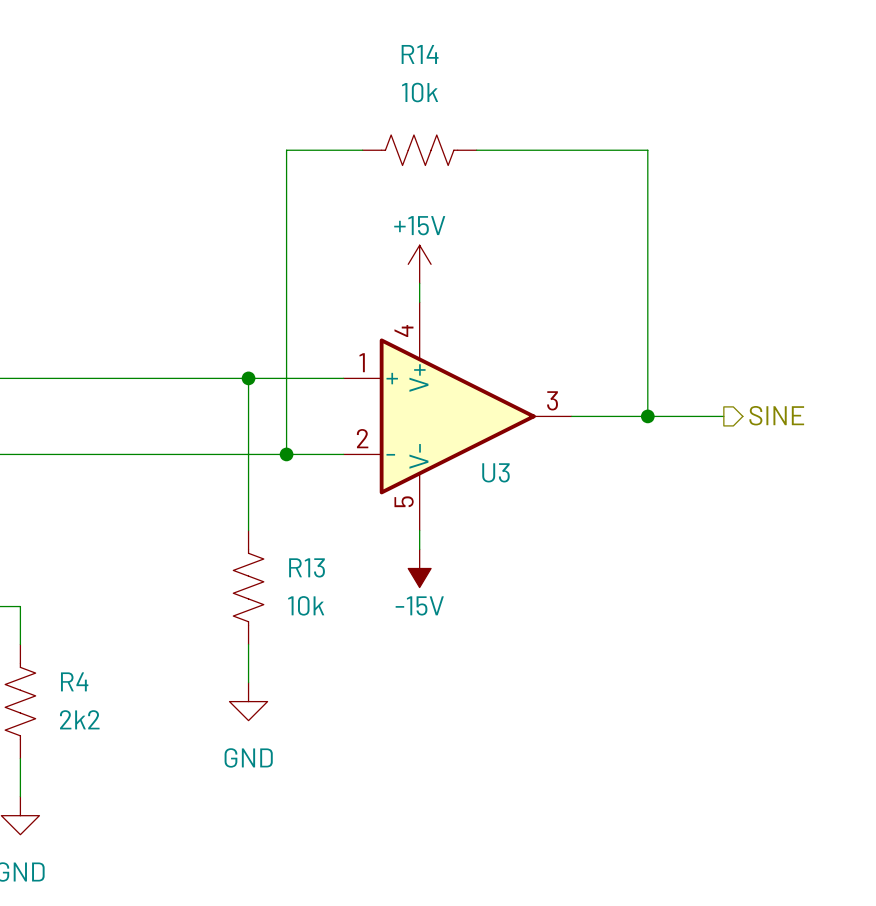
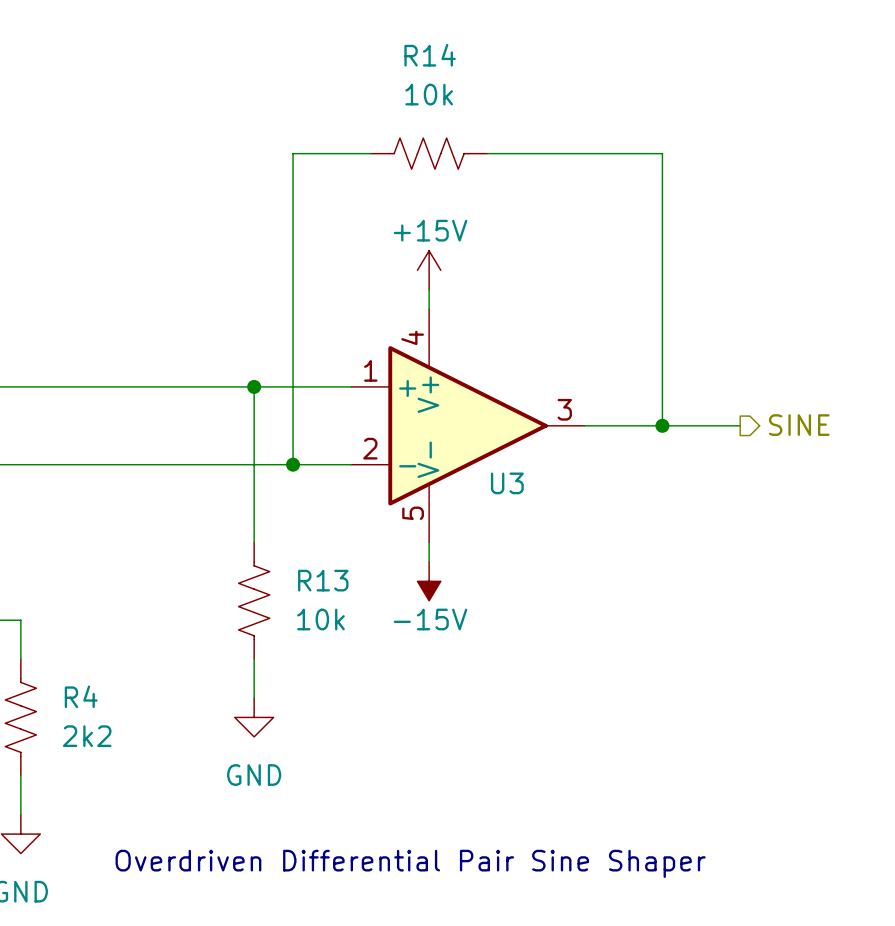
text: none -> Overdriven Differential Pair Sine Shaper (410, 863)

